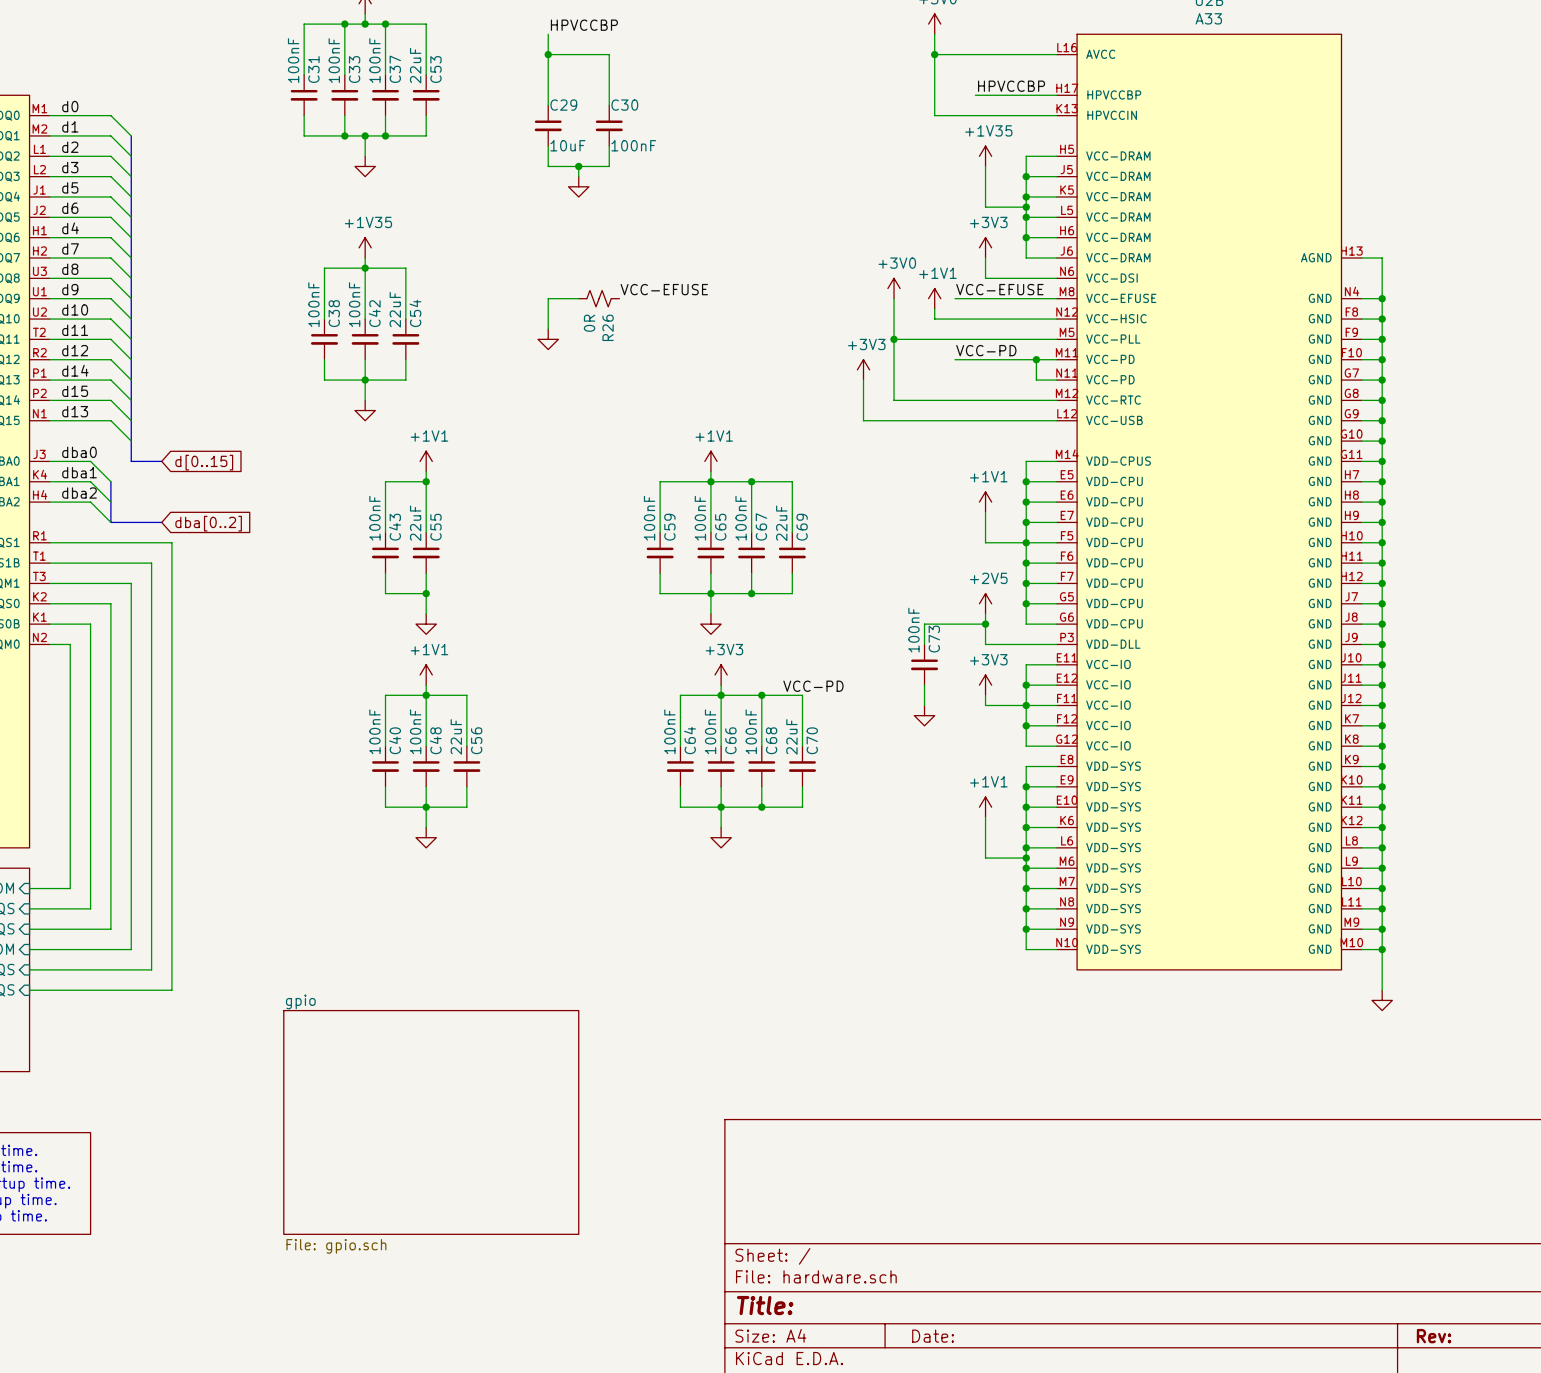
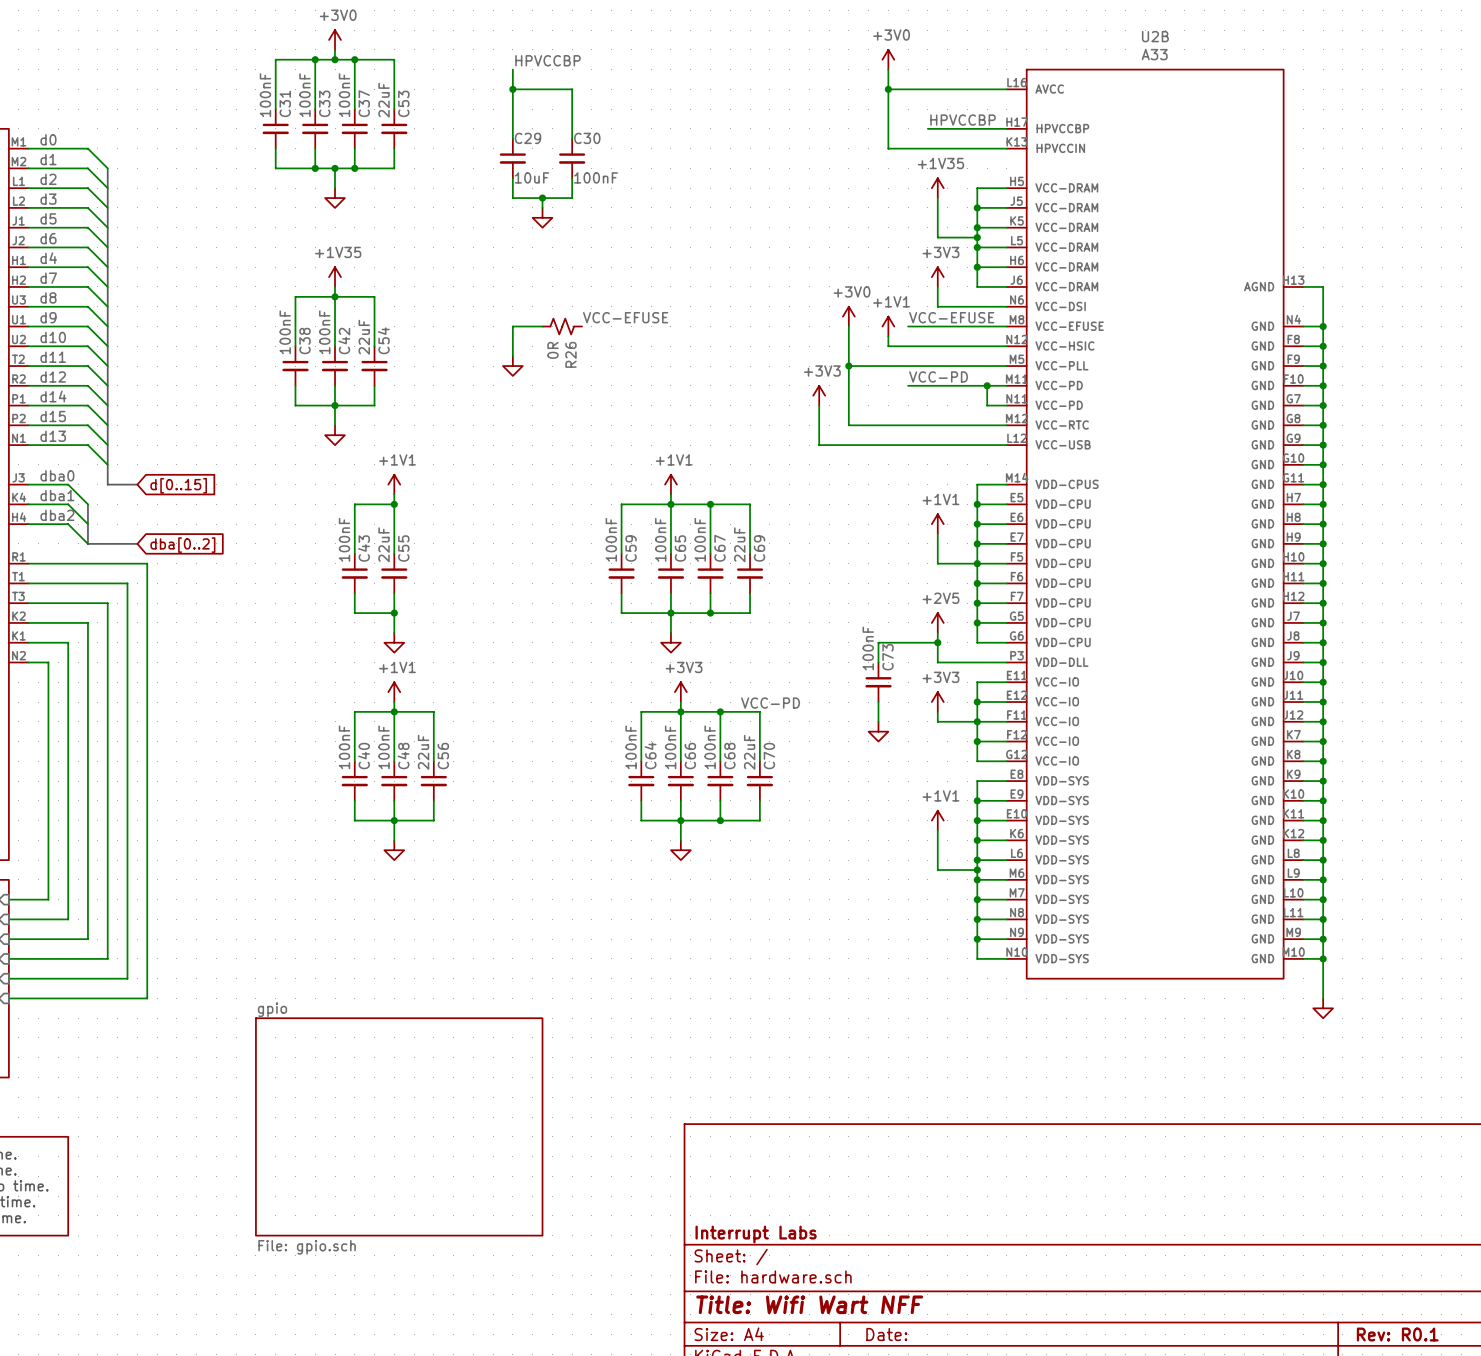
title block: none -> Interrupt Labs (756, 1234)
title block: Title: (765, 1305) -> Title: Wifi Wart NFF (809, 1304)
title block: Rev: (1434, 1336) -> Rev: R0.1 (1397, 1334)

